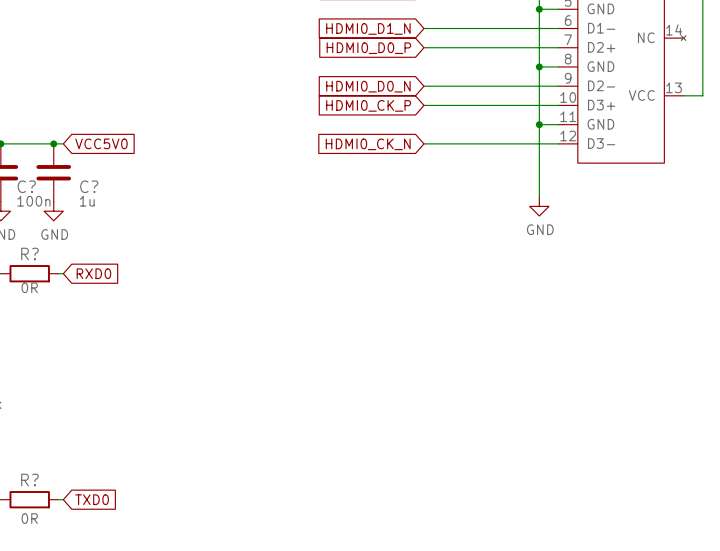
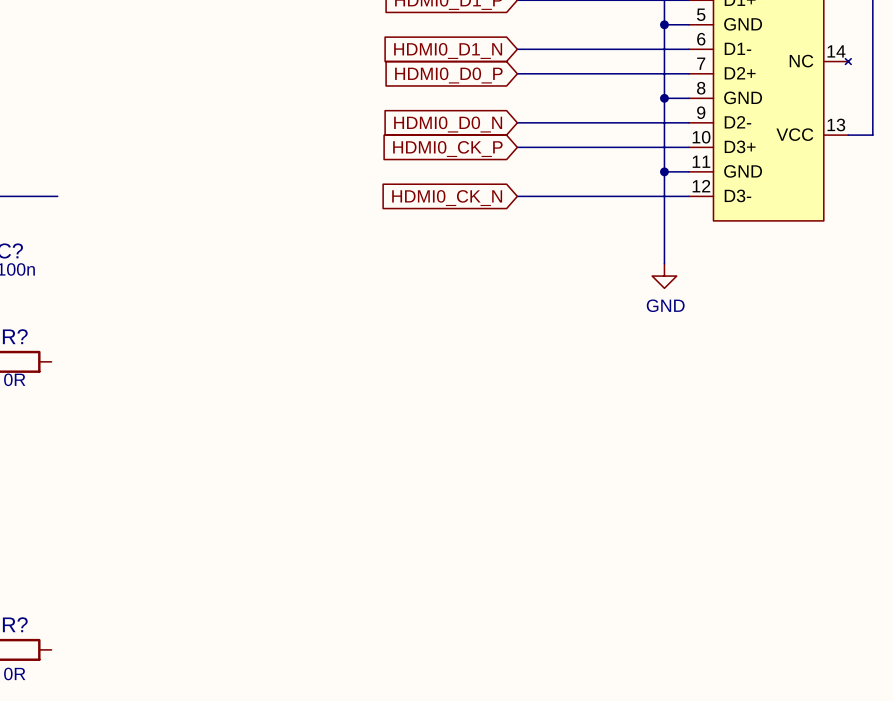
junction: (53, 143) -> none
global label: VCC5V0 (101, 143) -> none
C?: (53, 172) -> none
power symbol: GND (53, 211) -> none
wire: (58, 273) (63, 273) -> none
global label: RXD0 (93, 273) -> none
wire: (58, 499) (63, 499) -> none
global label: TXD0 (92, 499) -> none

